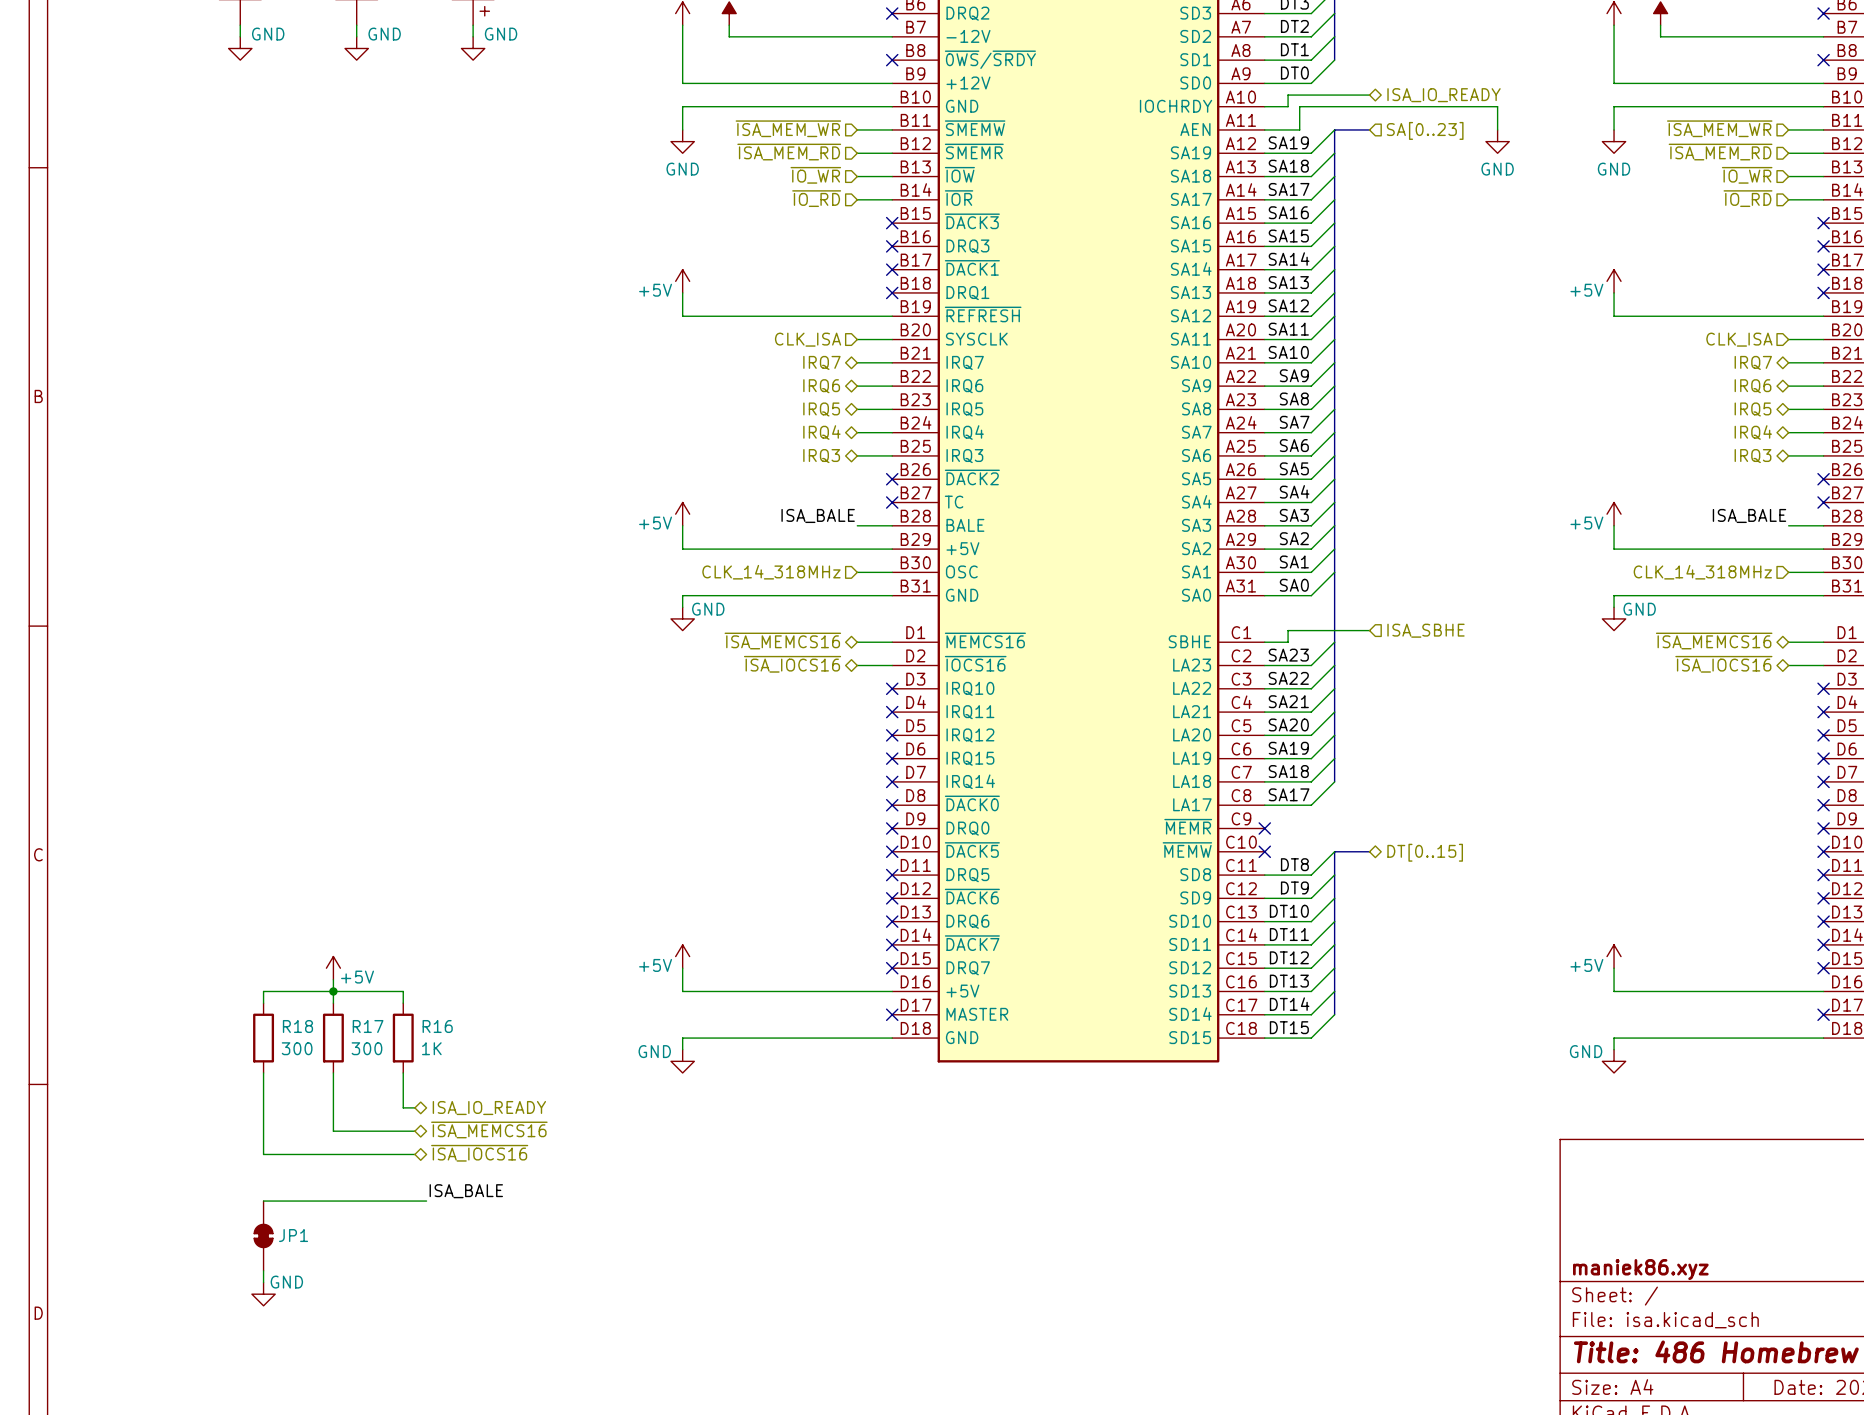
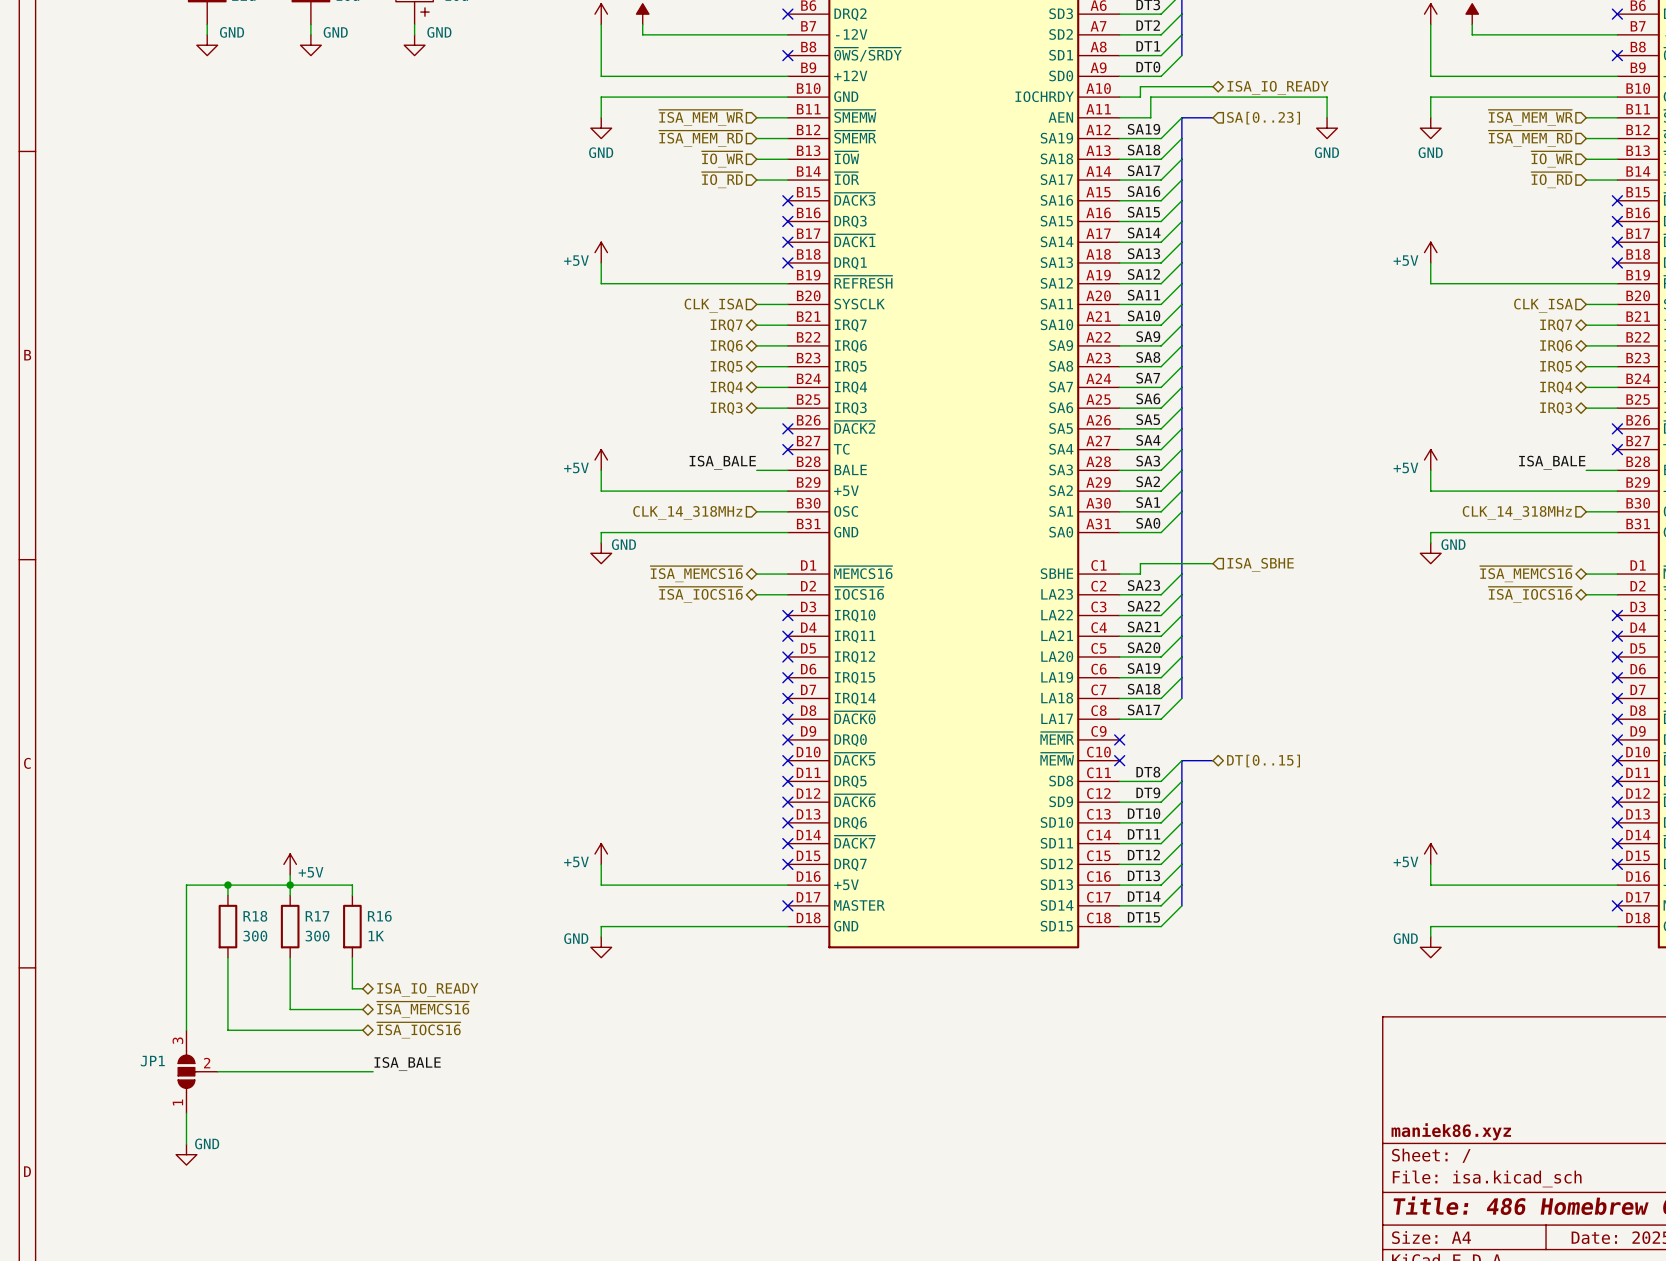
wire: none -> (227, 885) (186, 885) (186, 1030)
junction: none -> (227, 885)
wire: none -> (217, 1071) (227, 1071)
JP1 symbol: [254, 1201, 273, 1271] -> [178, 1030, 218, 1114]
JP1 name position: JP1 (293, 1235) -> JP1 (152, 1061)
wire: none -> (186, 1113) (186, 1144)
wire: (263, 1270) (263, 1282) -> none
power symbol position: GND (263, 1294) -> GND (186, 1154)

